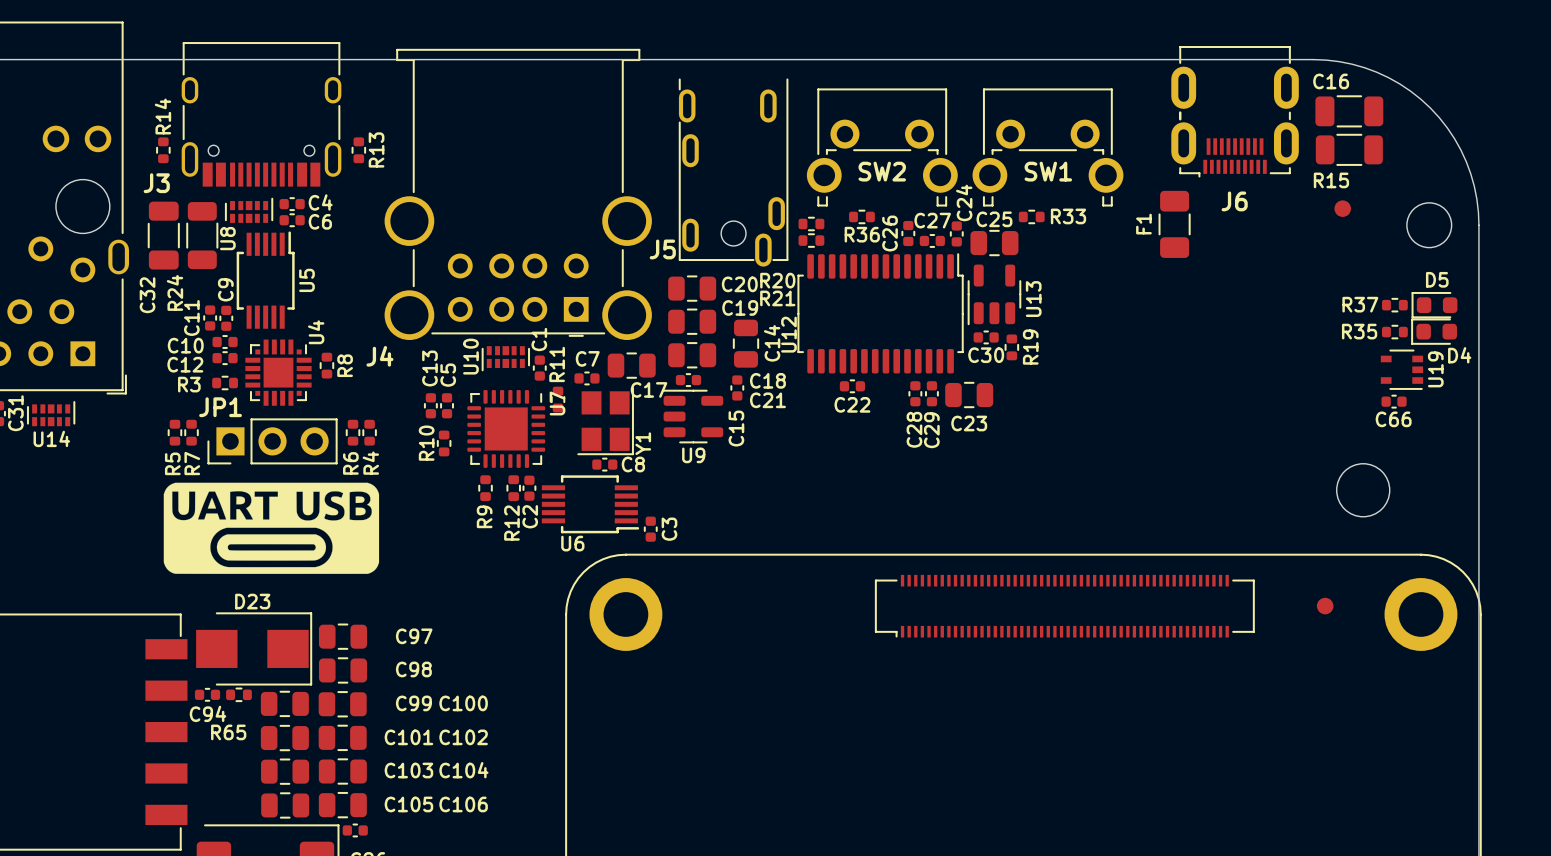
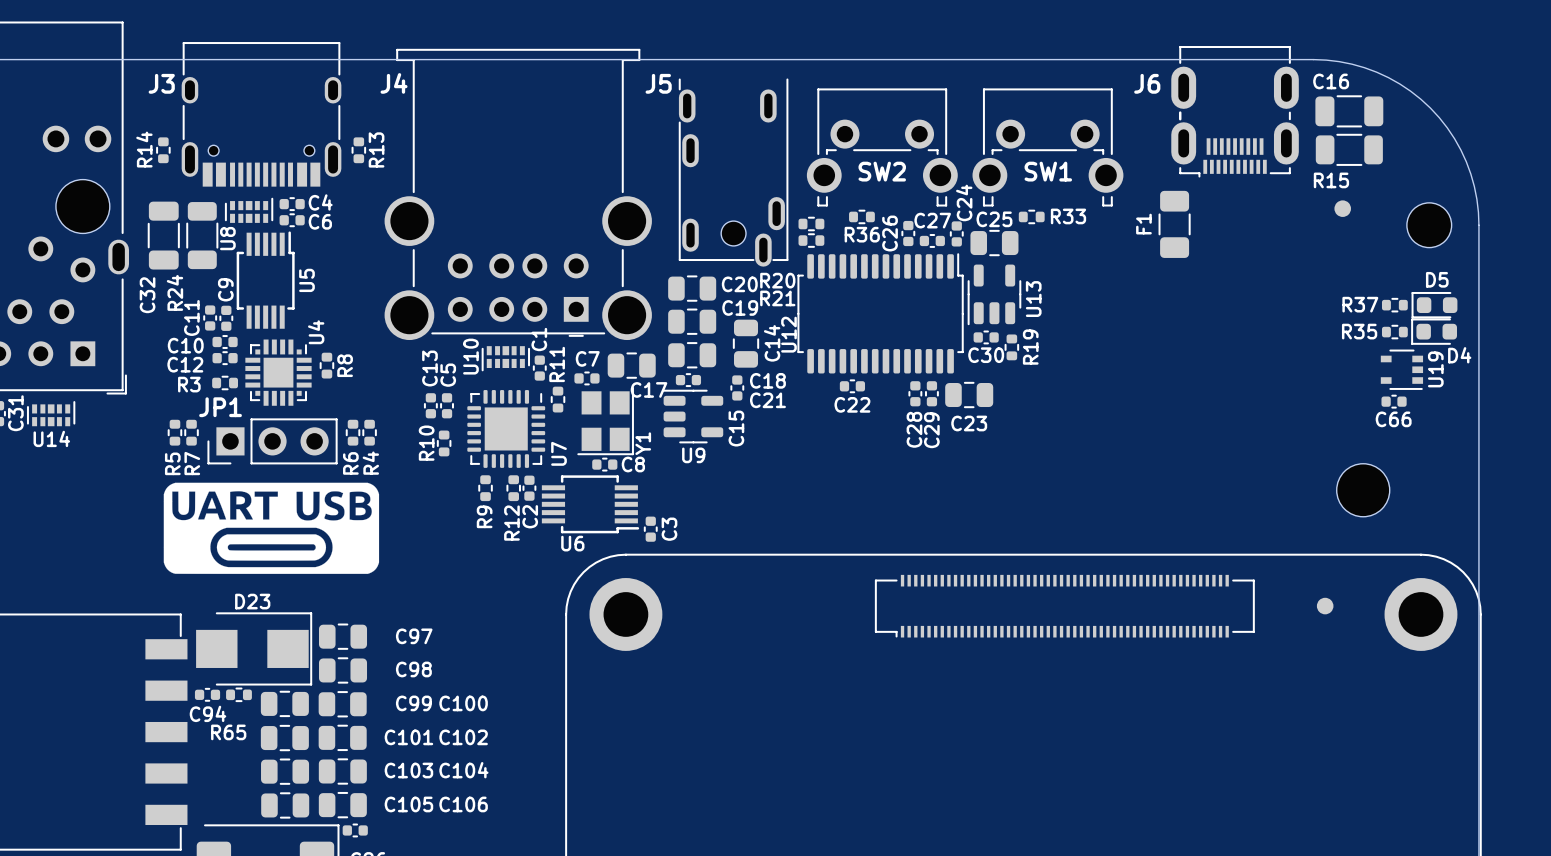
R14 name position: R14 (162, 116) -> R14 (144, 149)
J3 name position: J3 (156, 183) -> J3 (161, 83)
J6 name position: J6 (1234, 201) -> J6 (1147, 83)
J5 name position: J5 (662, 249) -> J5 (658, 83)
J4 name position: J4 (379, 356) -> J4 (394, 83)
U7 name position: U7 (557, 403) -> U7 (559, 453)

